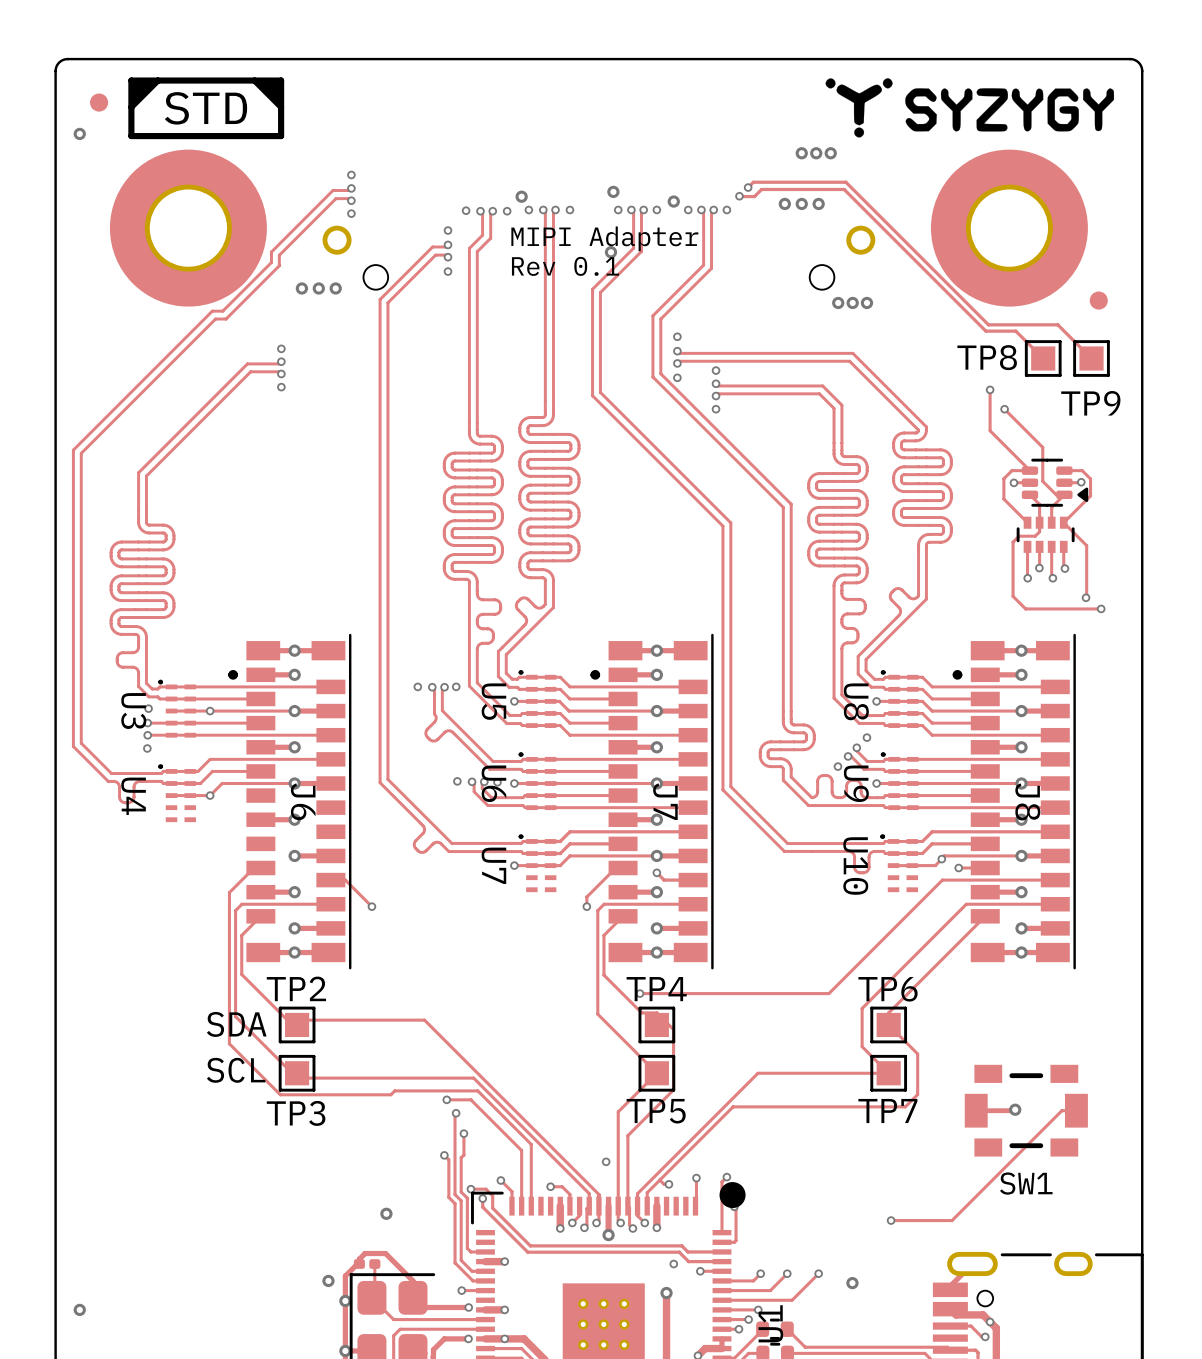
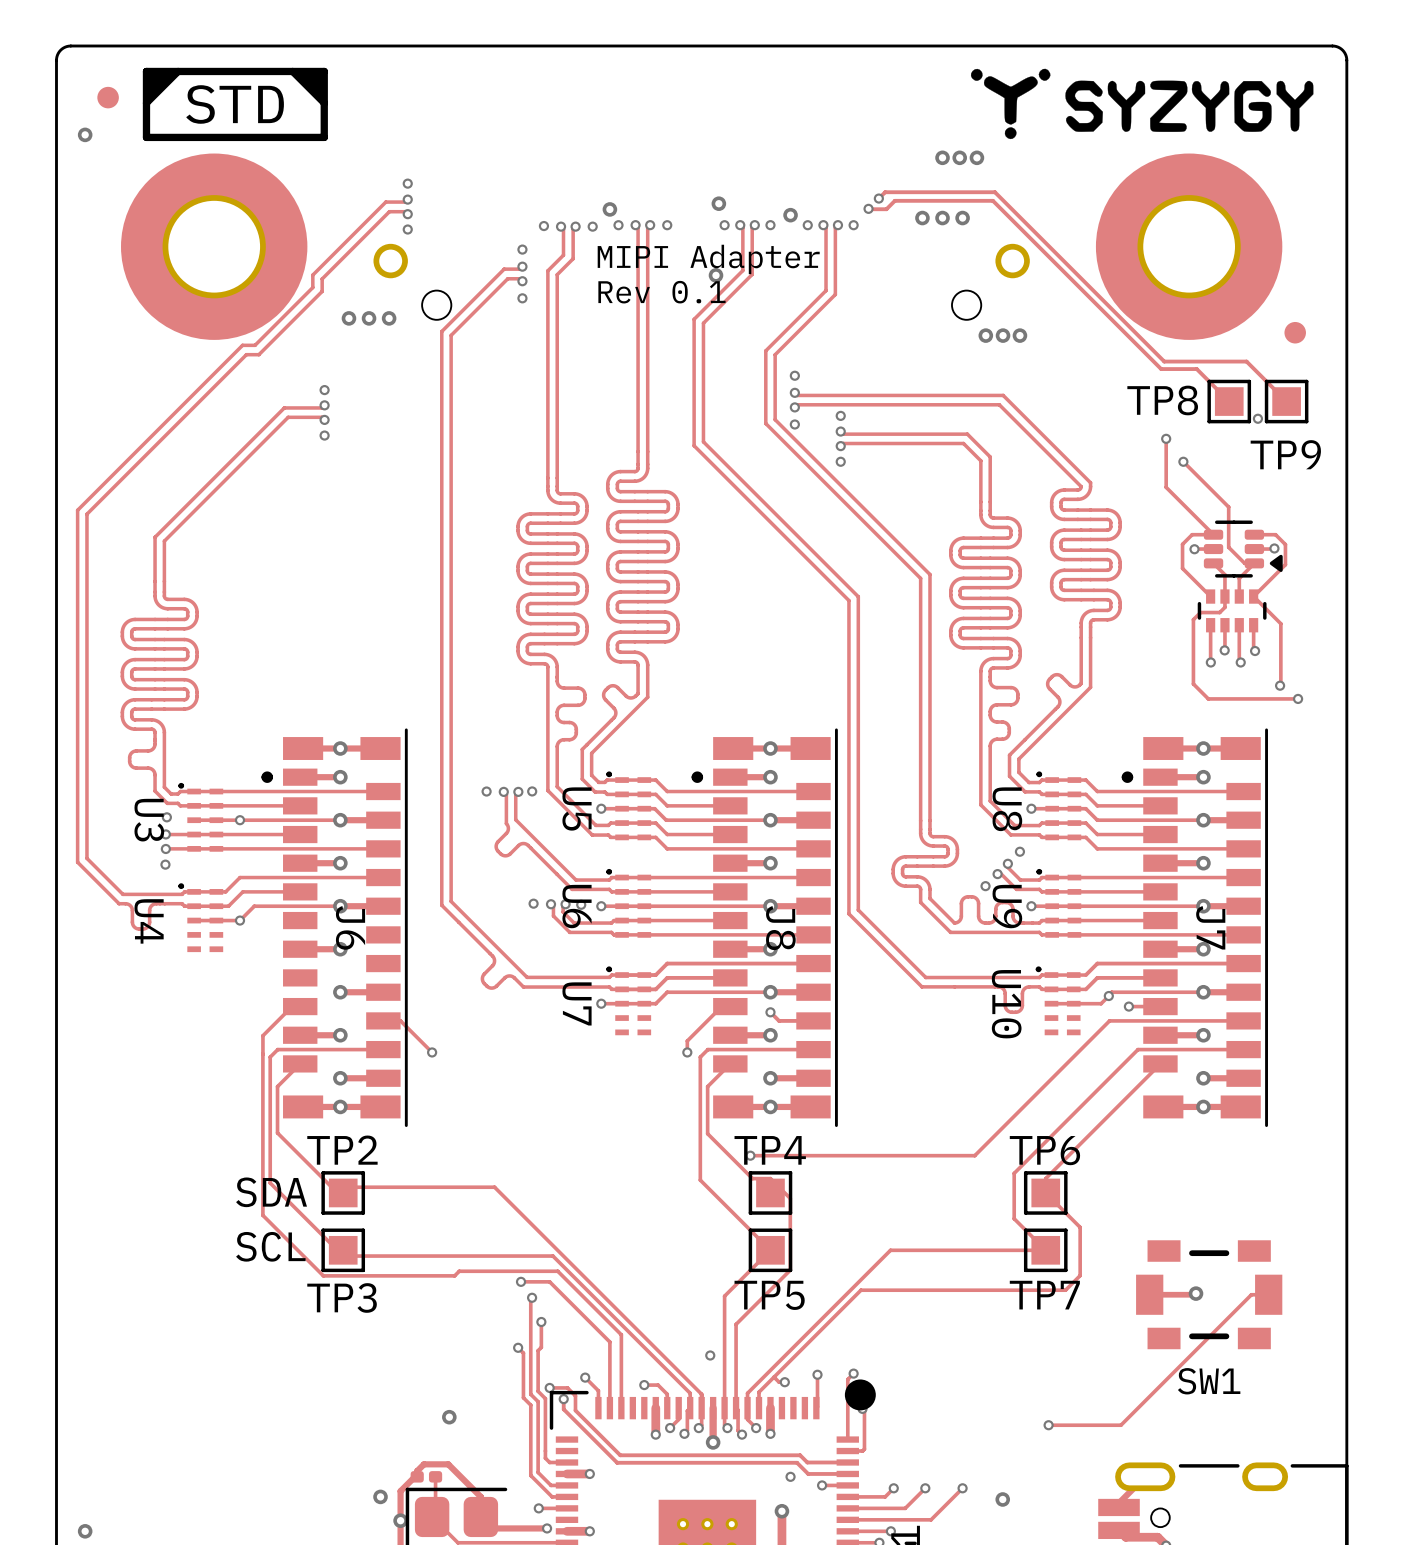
via: none -> (1257, 418)
J7 name: J7 (665, 801) -> J8 (780, 928)
J8 name: J8 (1027, 801) -> J7 (1210, 927)

